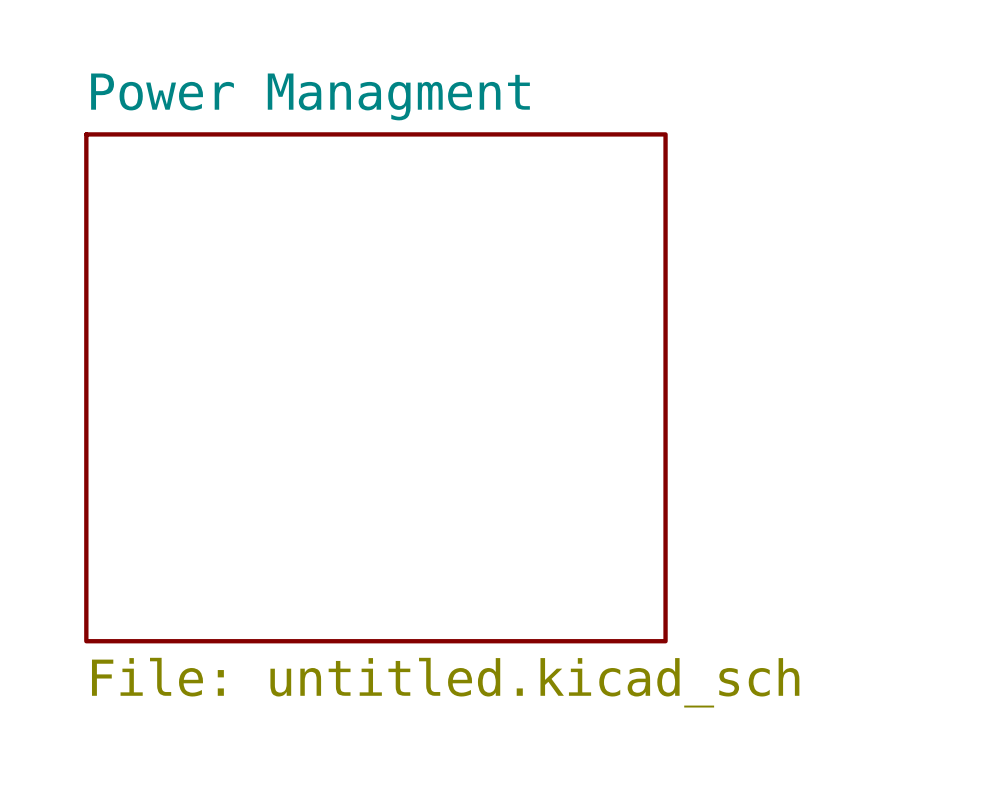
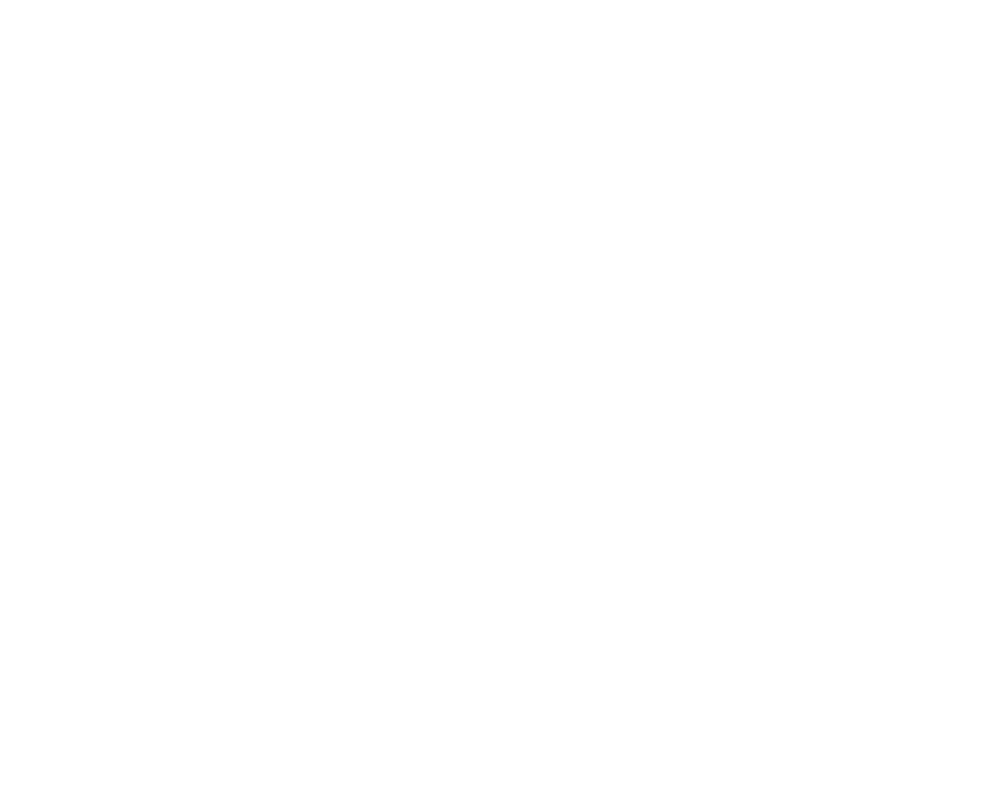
sheet Power Managment: File: untitled.kicad_sch (375, 387) -> none

